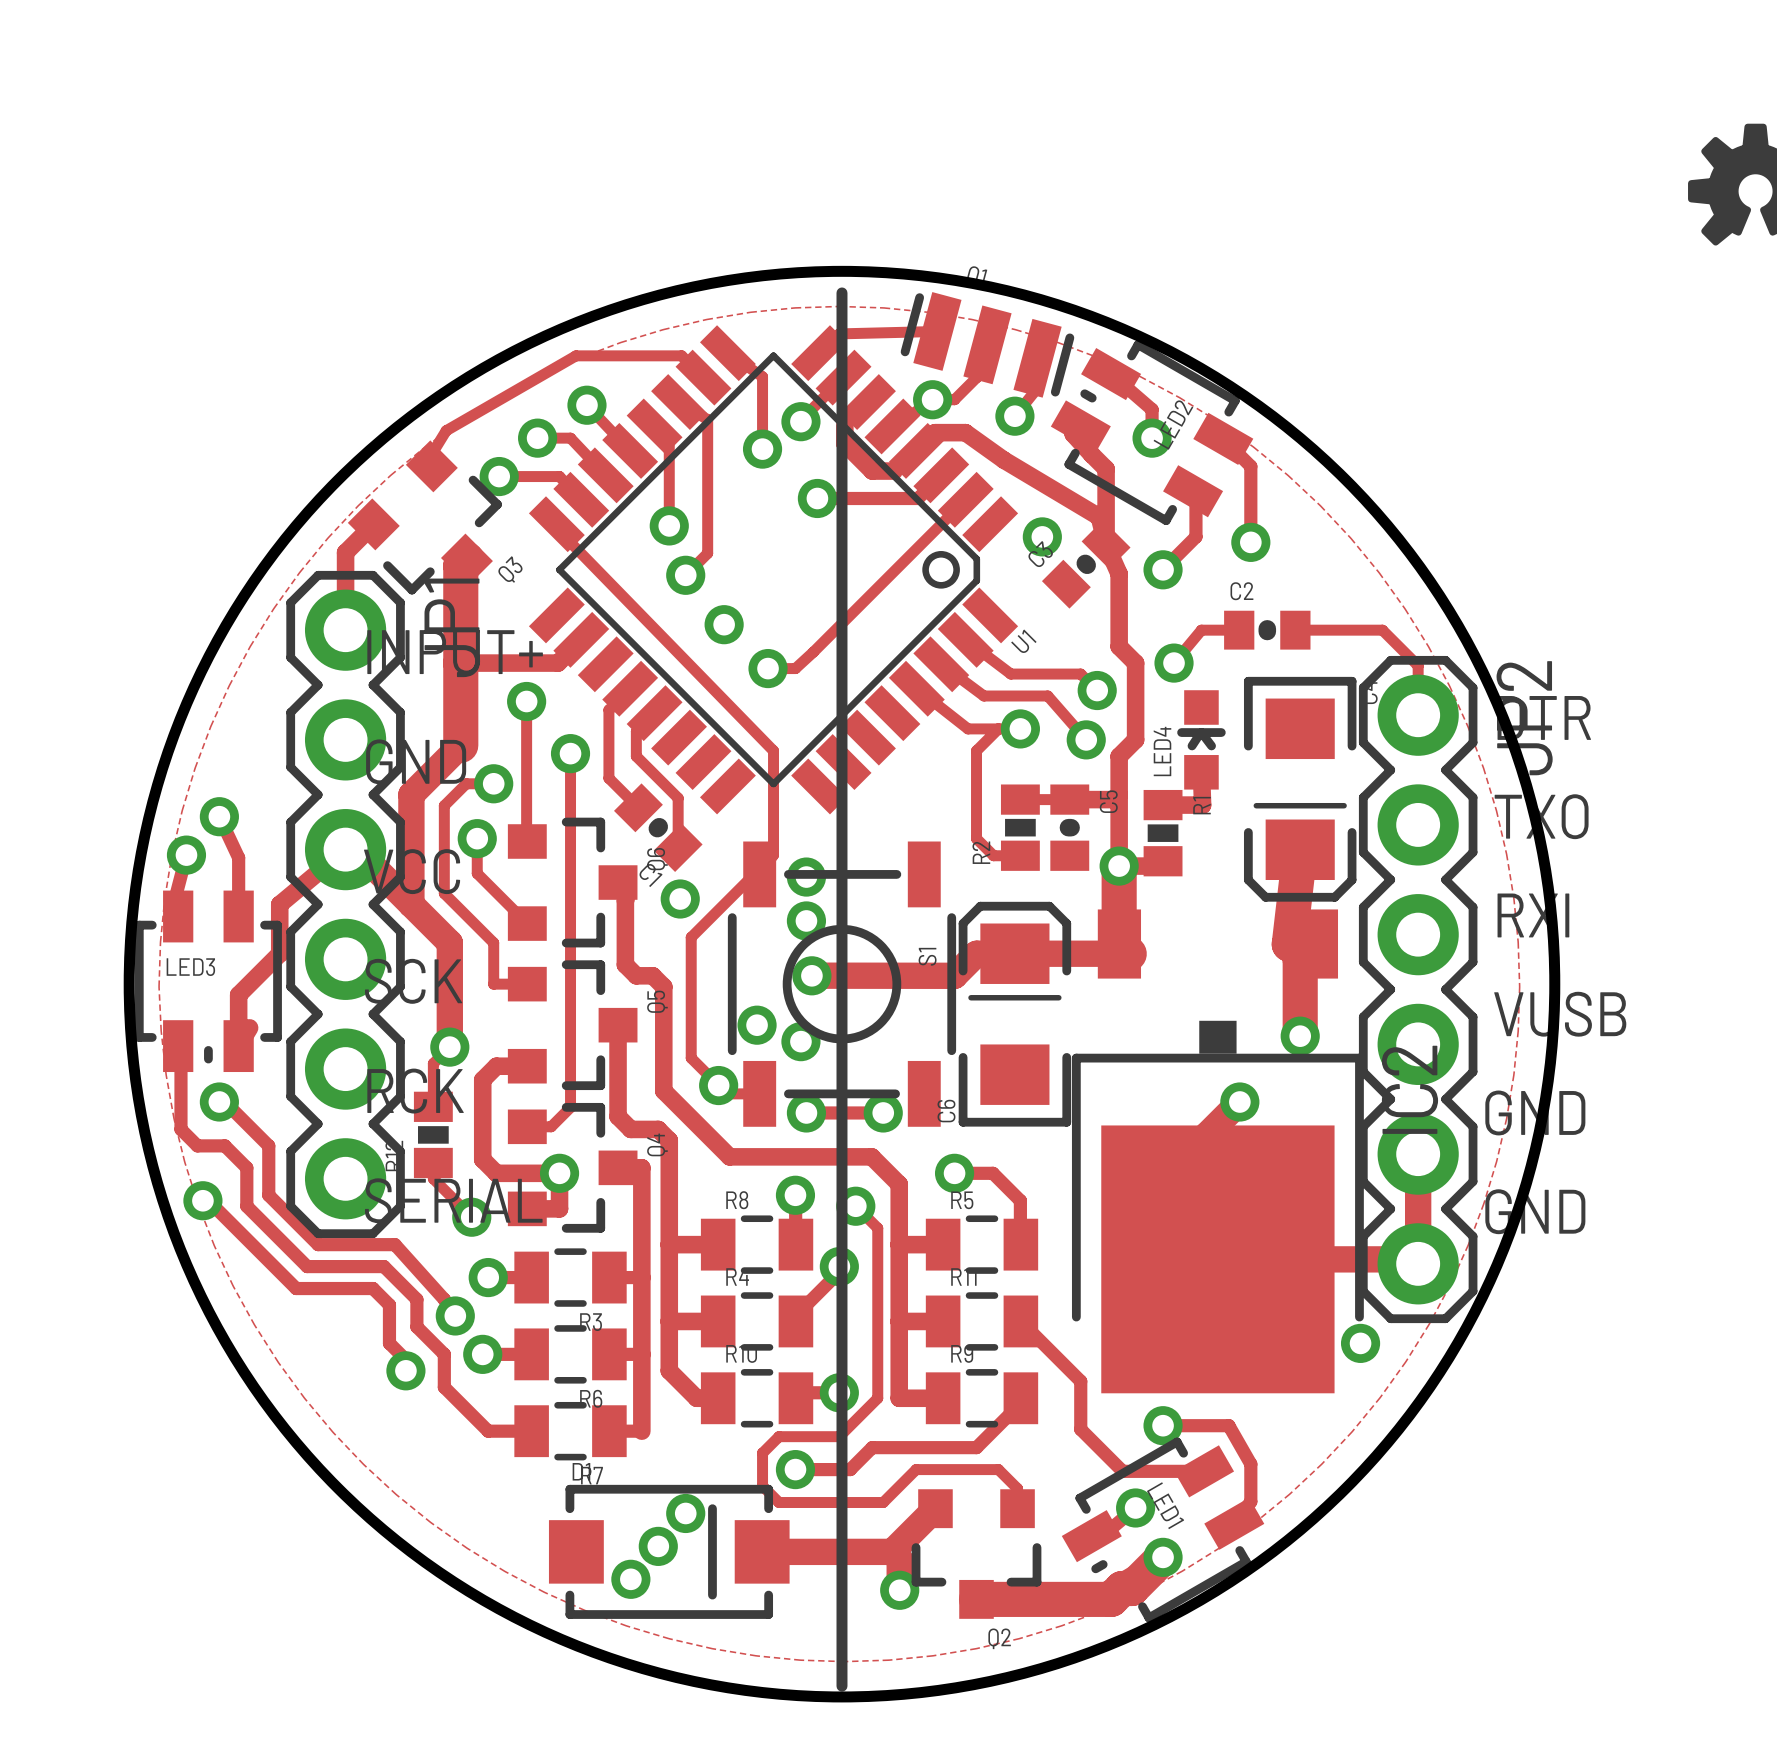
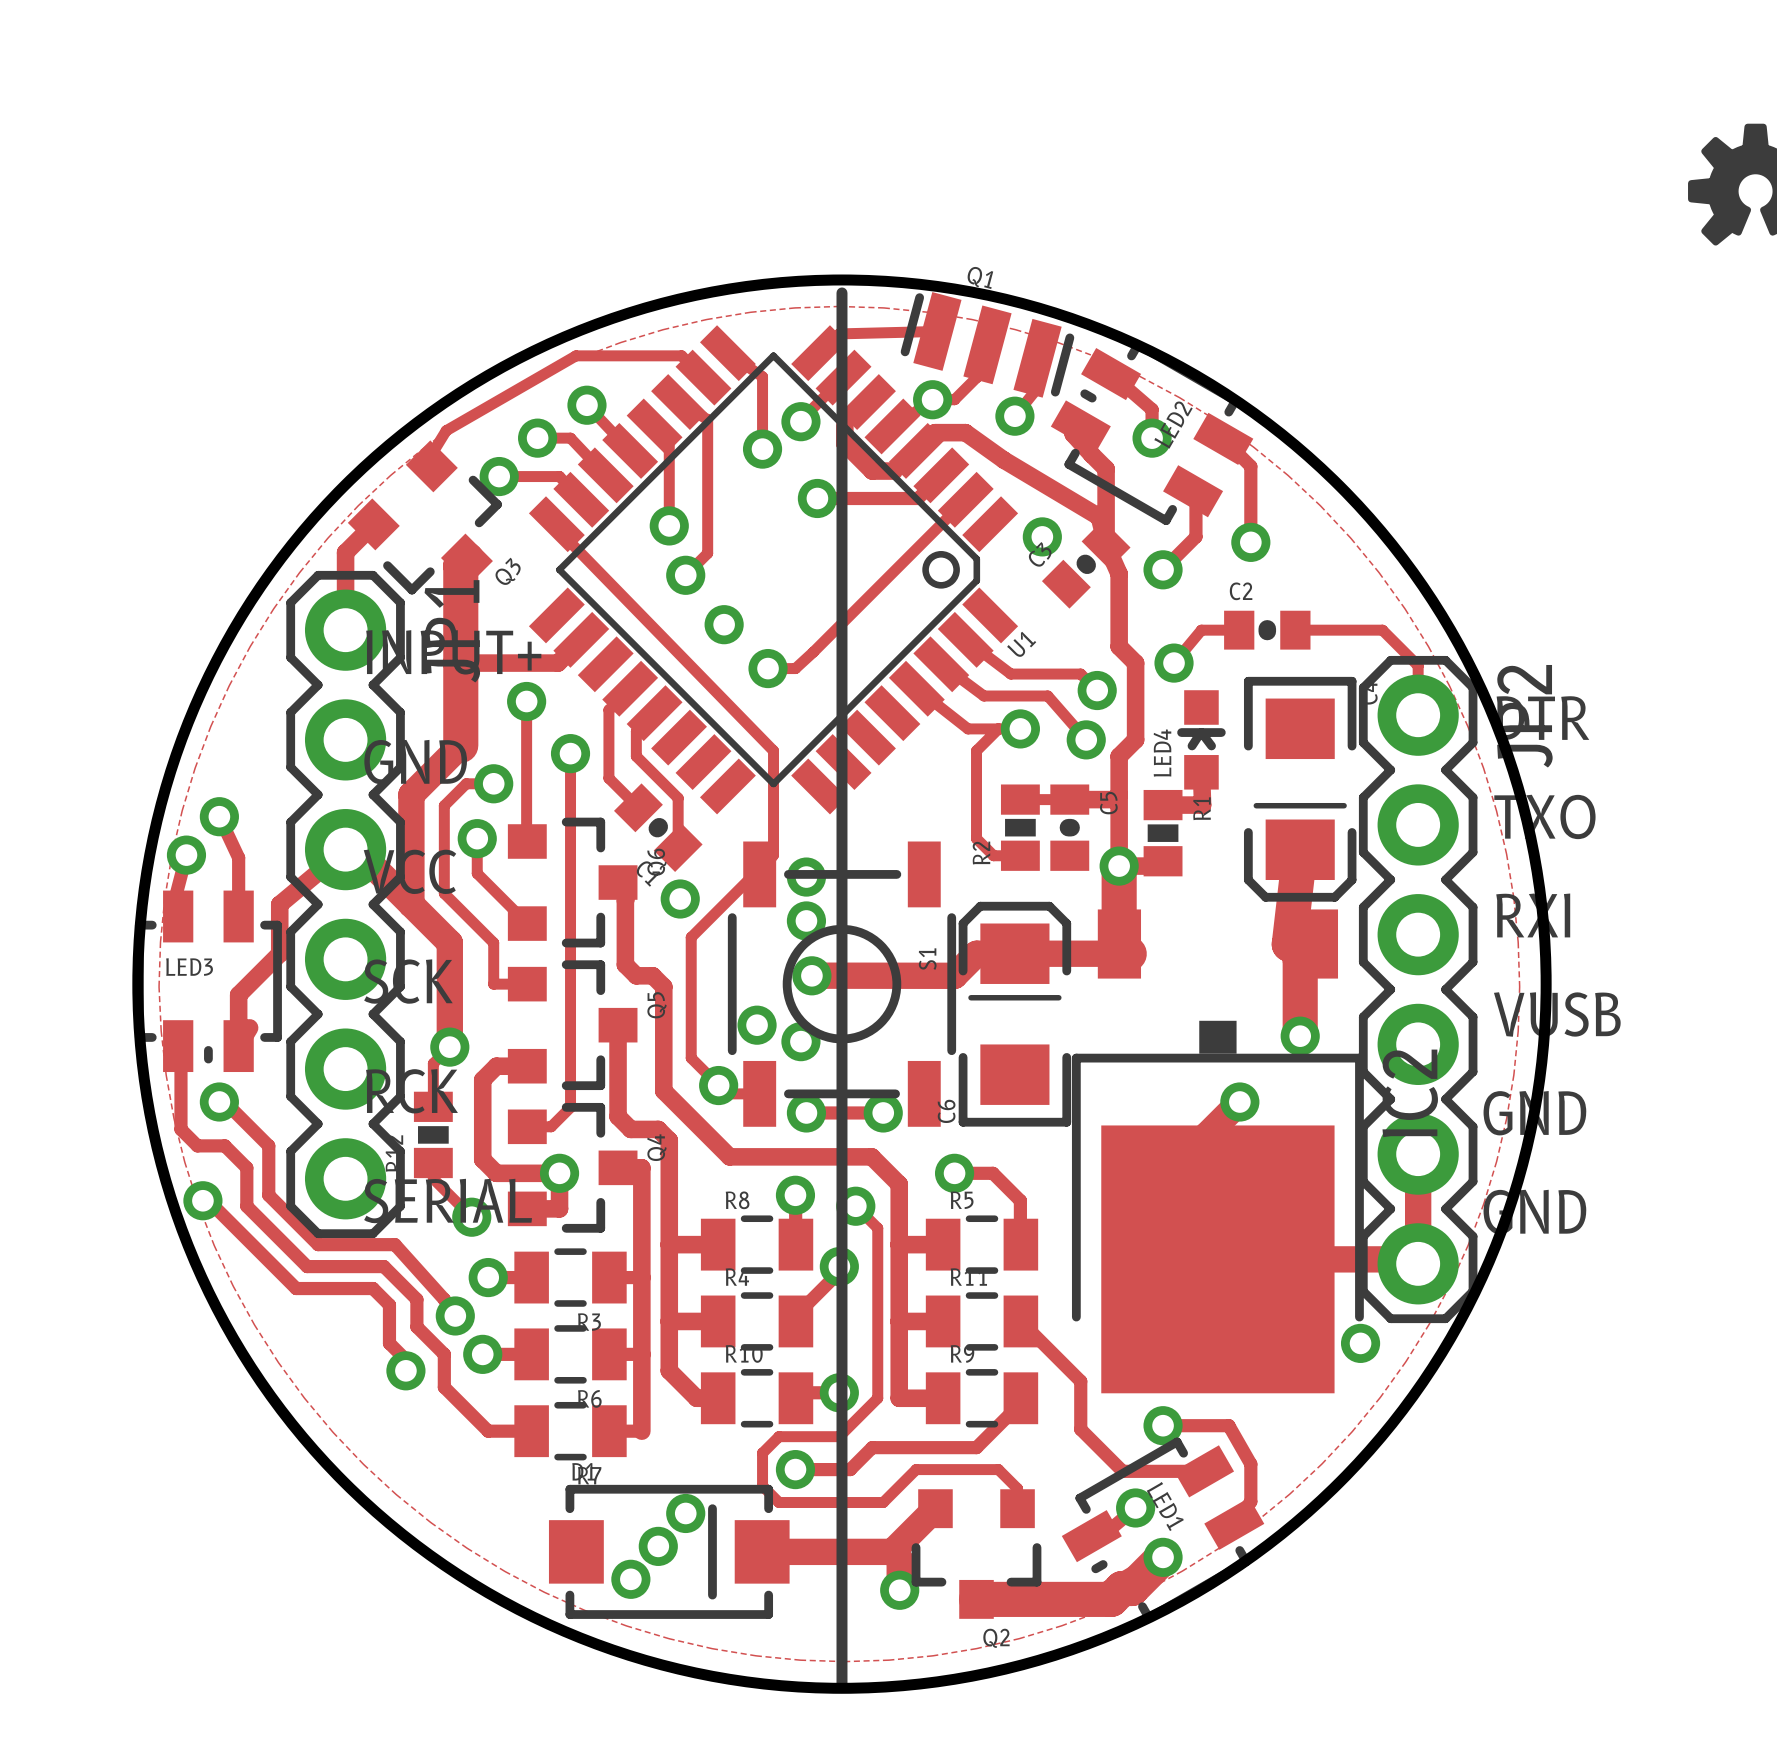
round board edge size: [123, 265, 1561, 1703] -> [132, 274, 1552, 1694]

